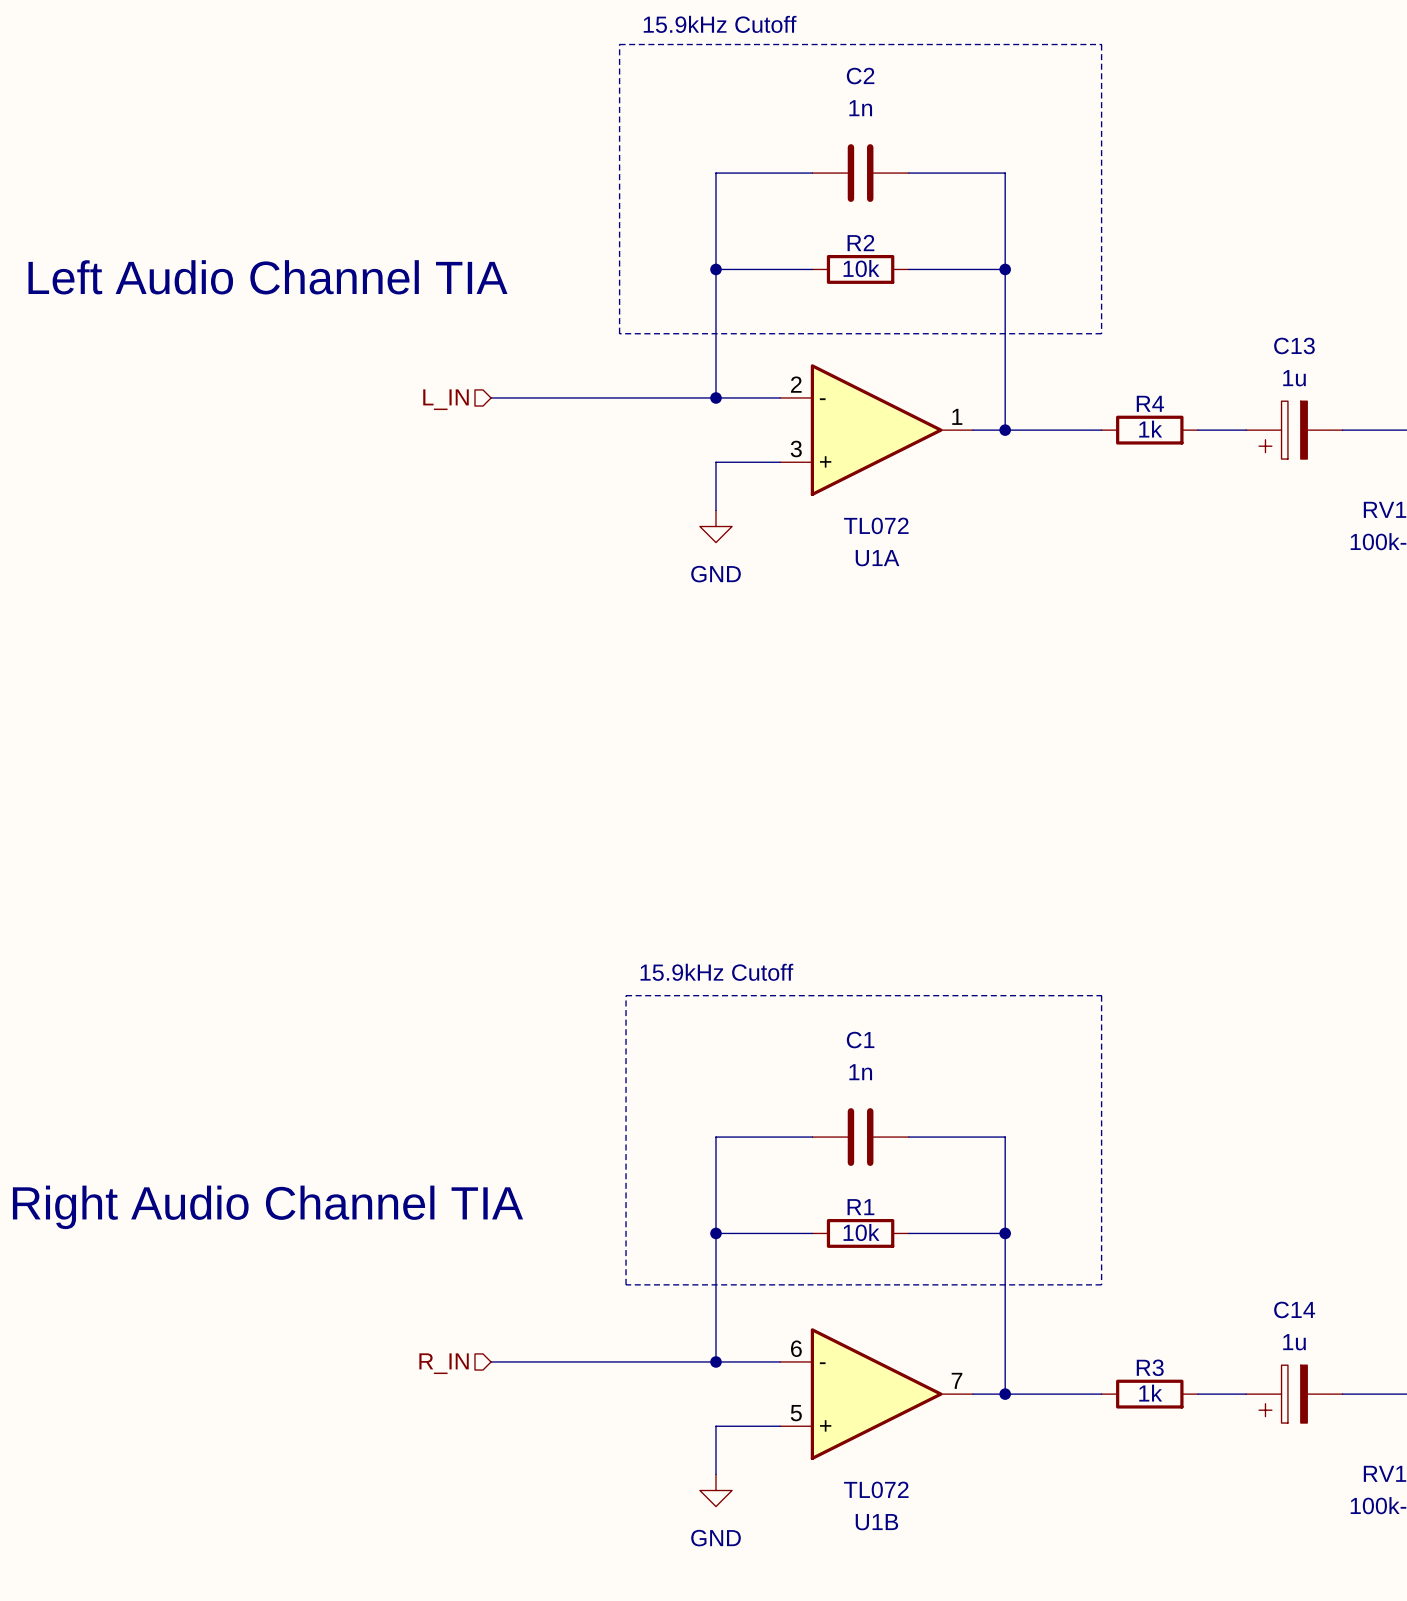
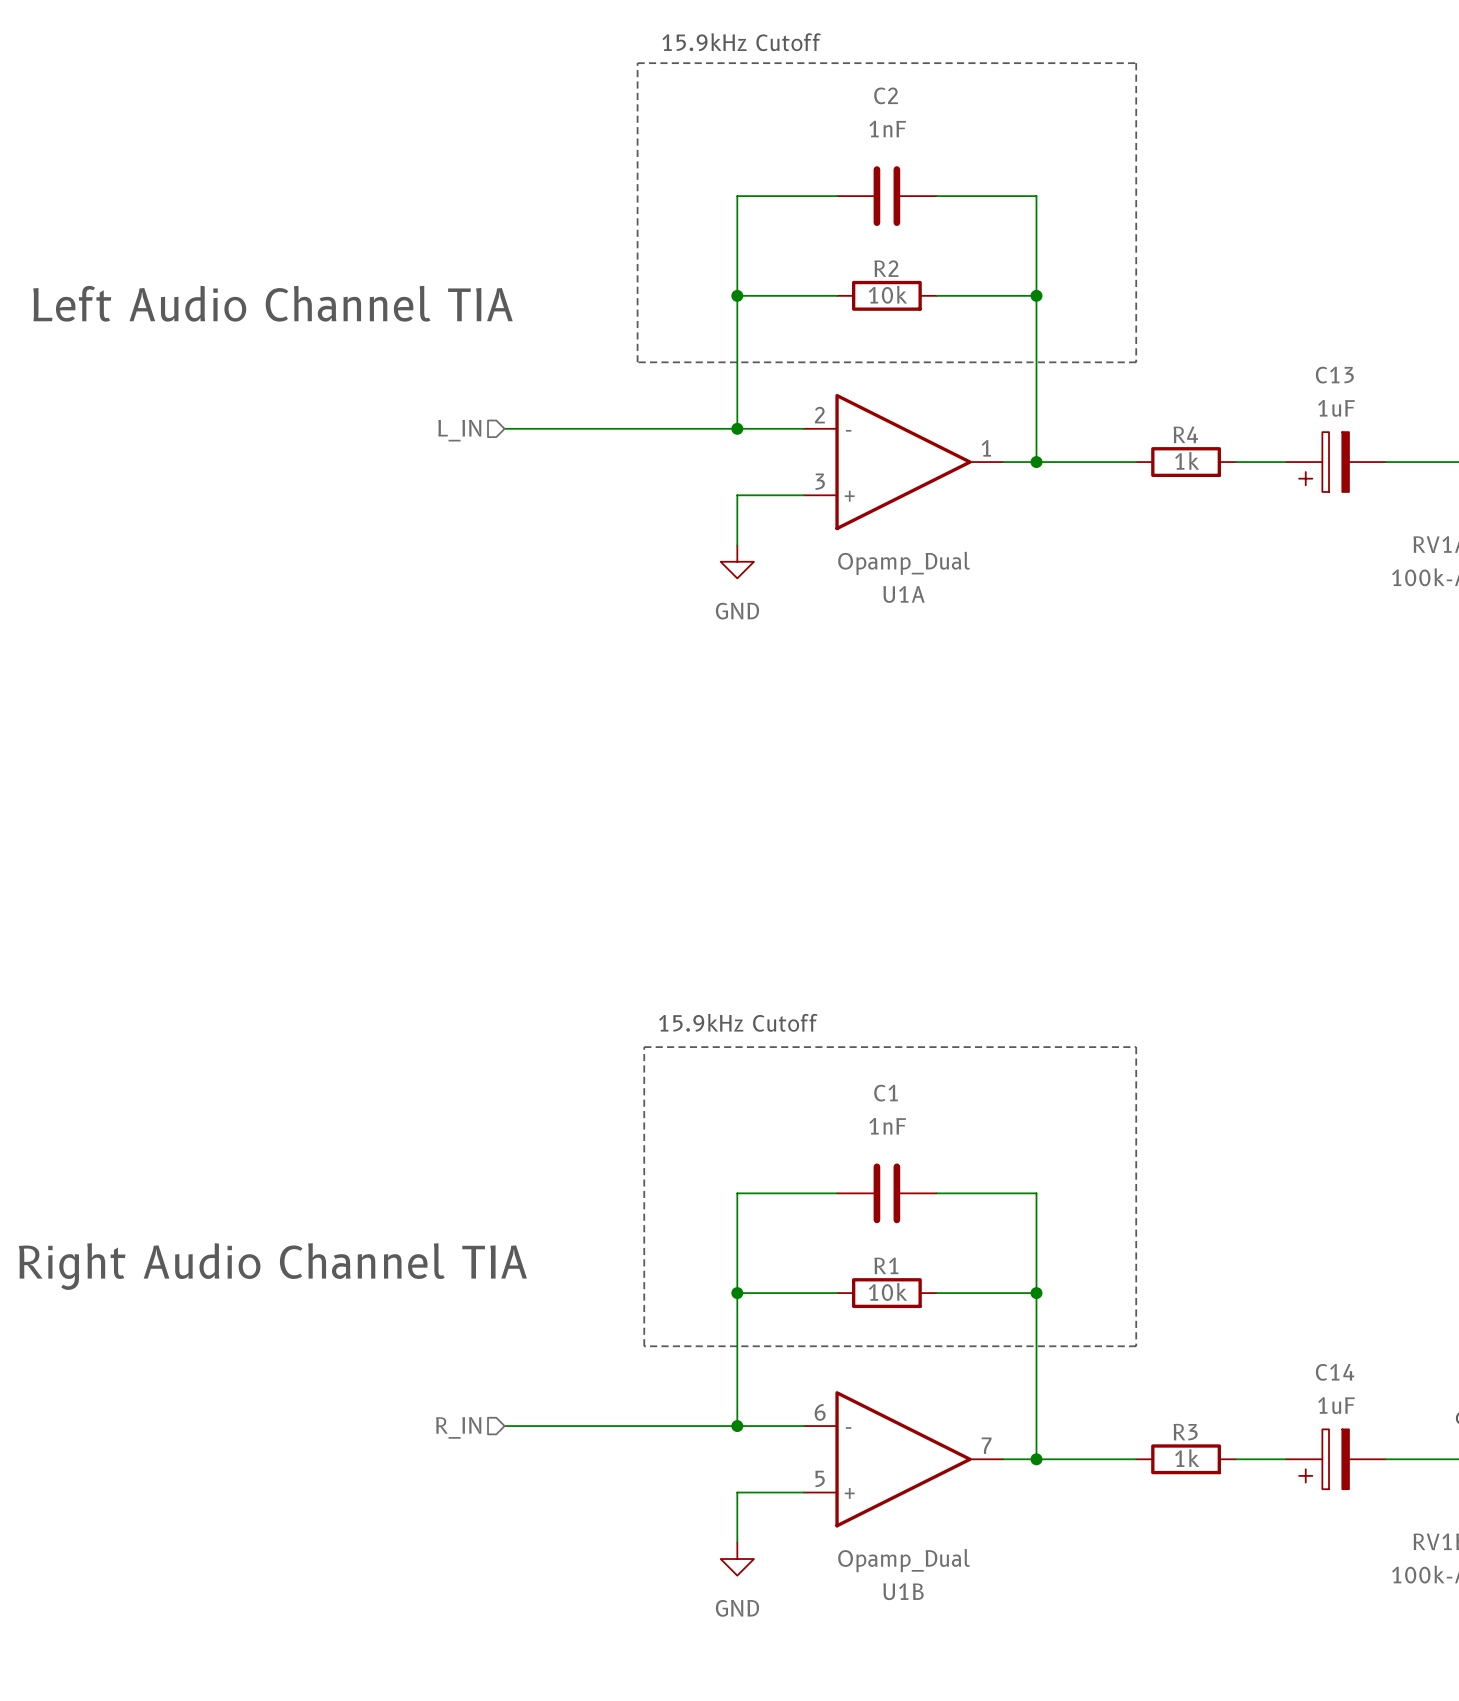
C2 value: 1n (860, 108) -> 1nF (887, 129)
C13 value: 1u (1294, 378) -> 1uF (1336, 408)
U1A value: TL072 (876, 525) -> Opamp_Dual (904, 563)
C1 value: 1n (860, 1072) -> 1nF (887, 1126)
C14 value: 1u (1294, 1342) -> 1uF (1336, 1405)
U1B value: TL072 (876, 1489) -> Opamp_Dual (904, 1560)

